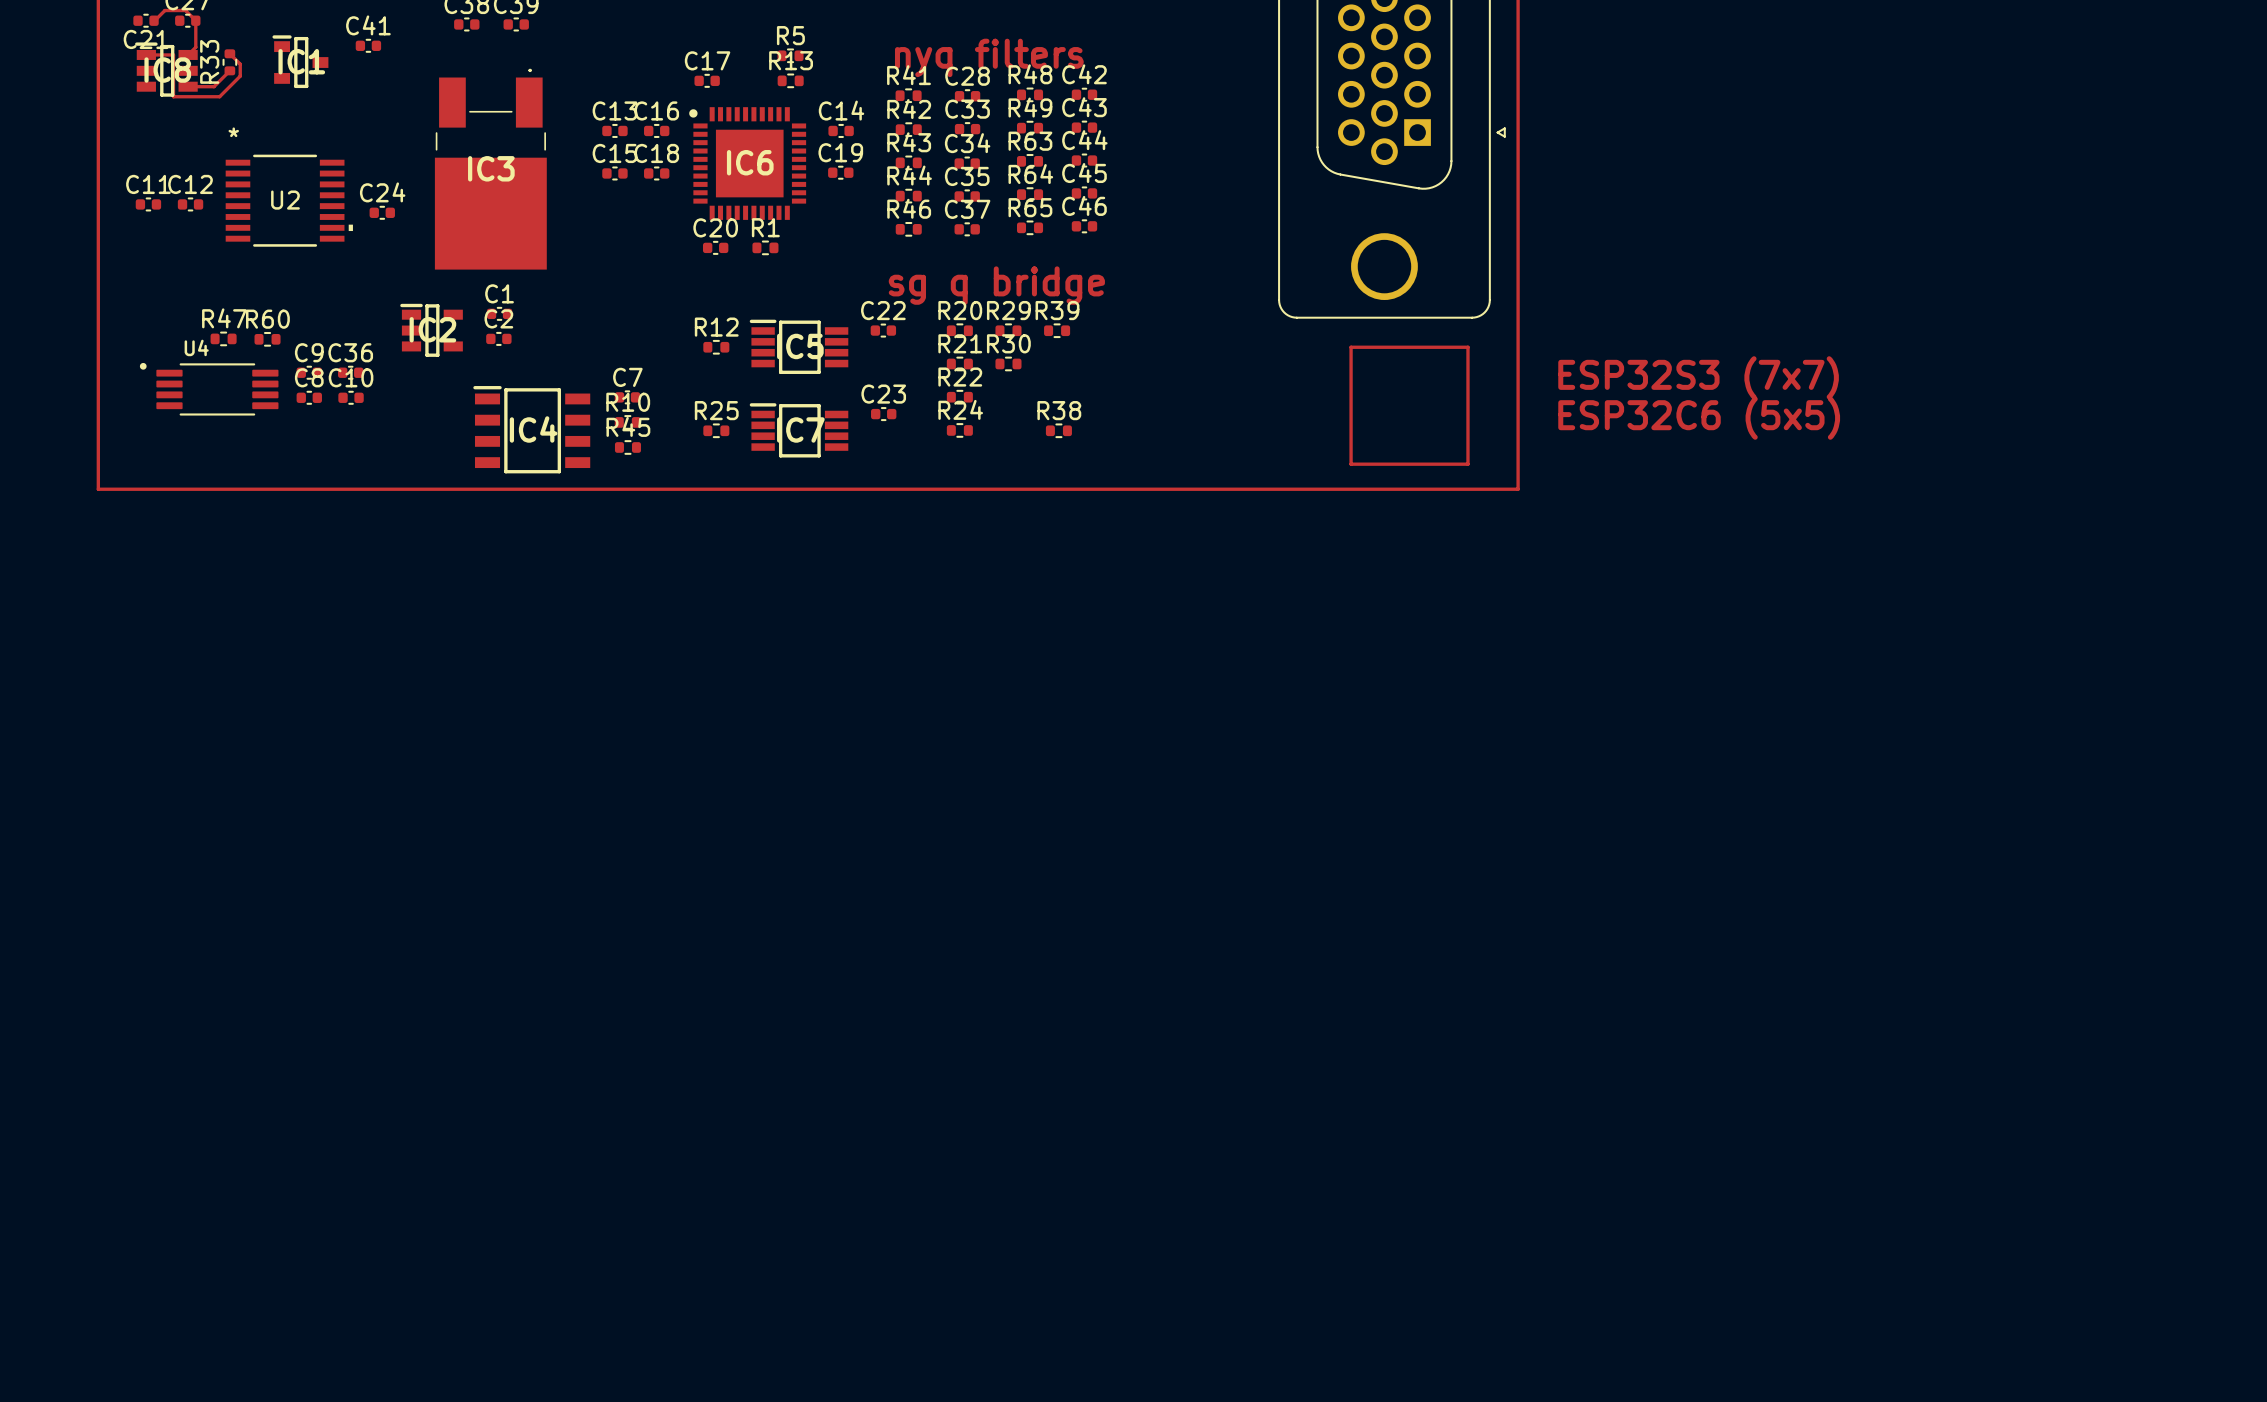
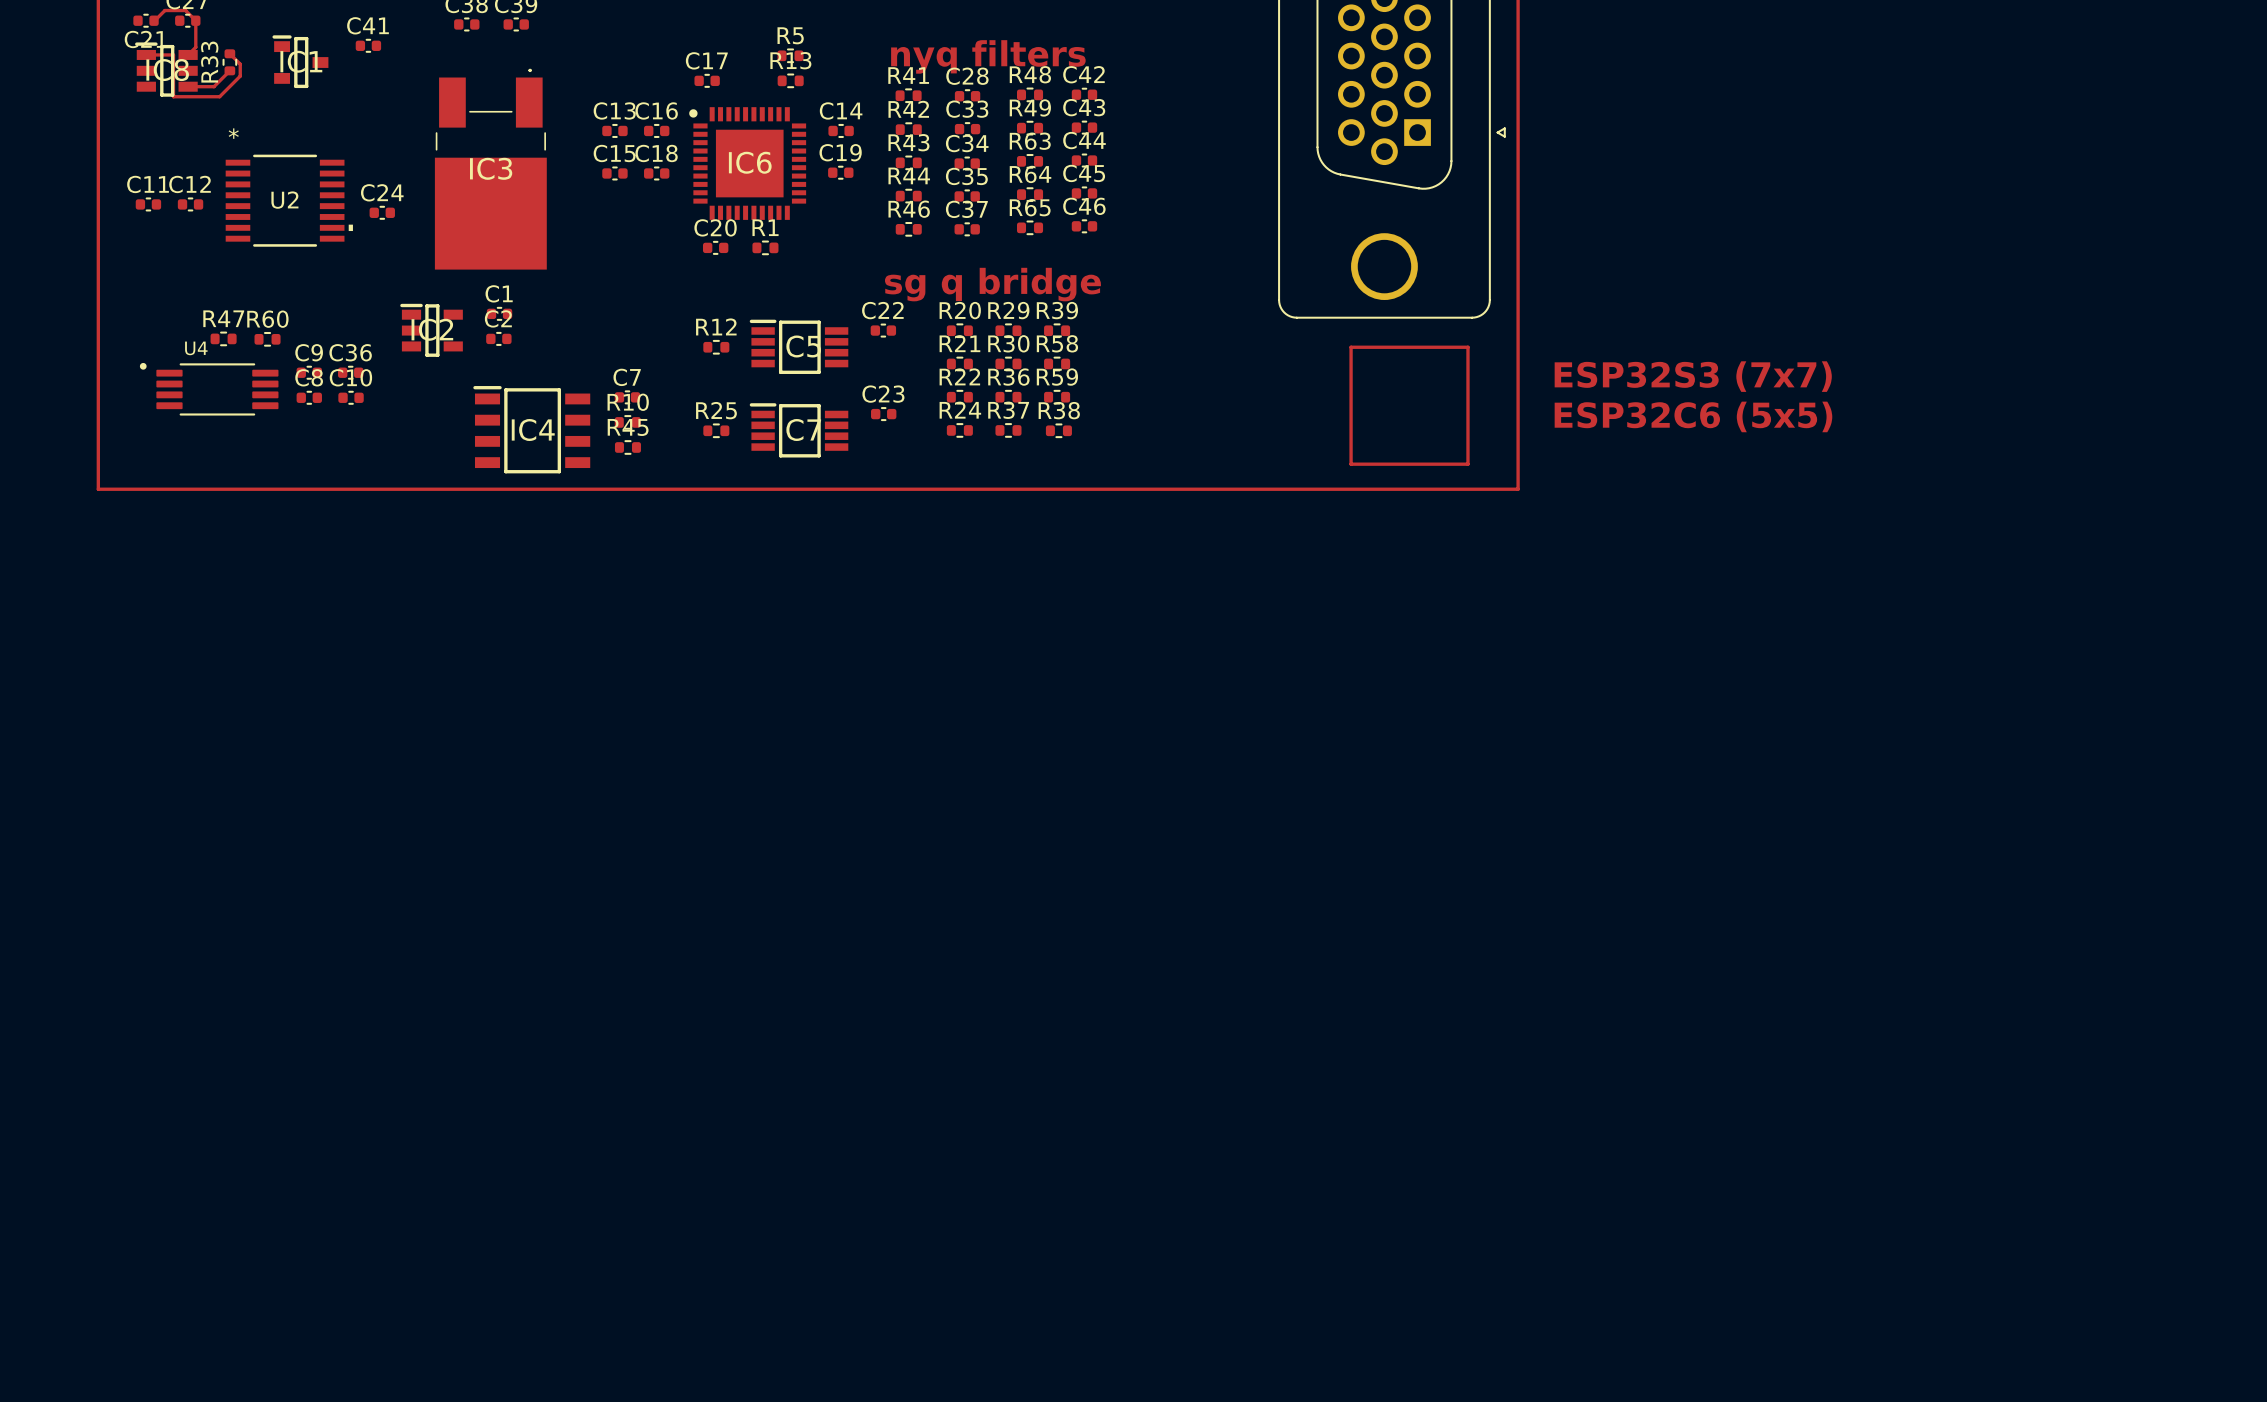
R58: none -> (1057, 363)
R36: none -> (1008, 397)
R59: none -> (1057, 397)
R37: none -> (1008, 430)

